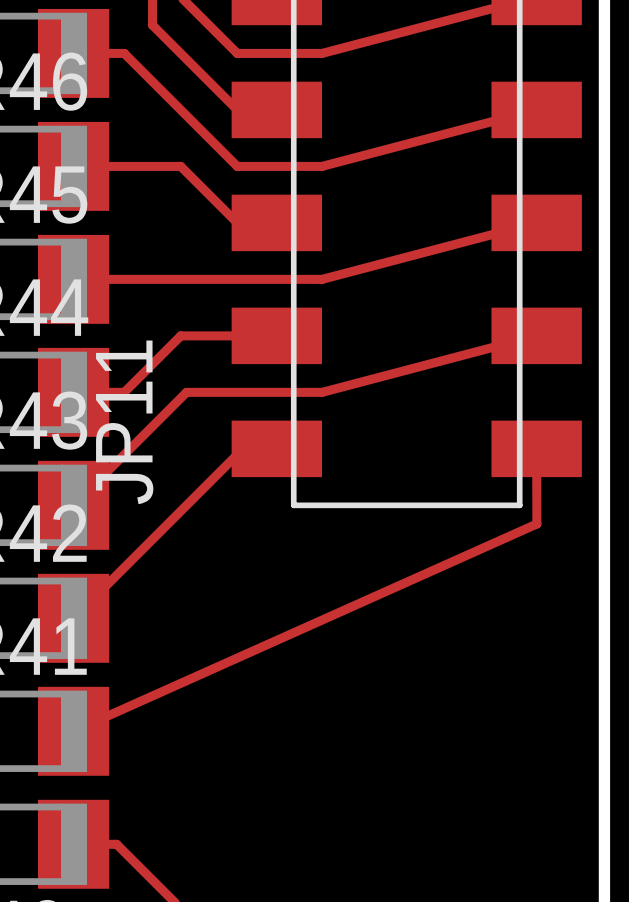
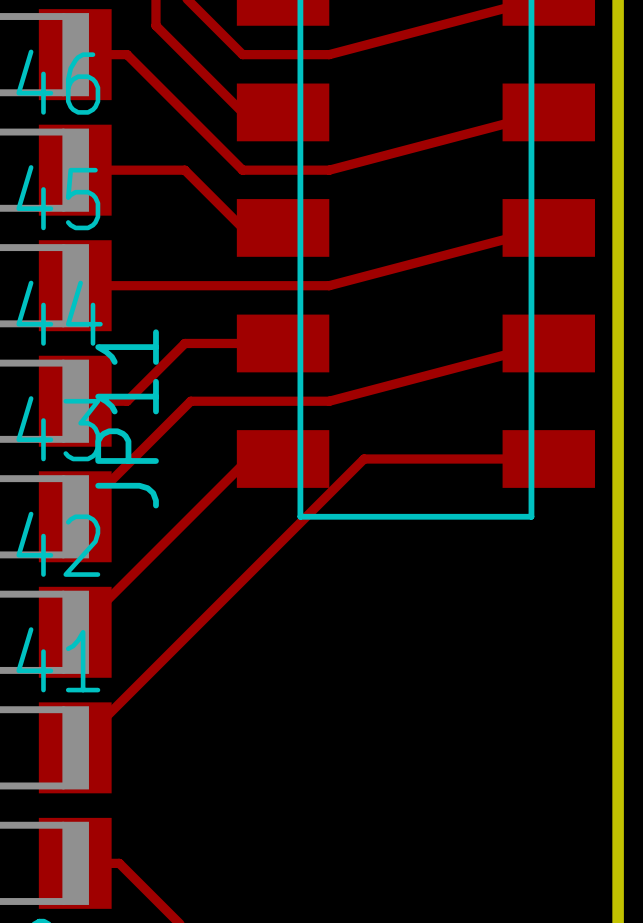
track: (536, 448) (536, 524) (73, 731) -> (548, 459) (364, 459) (75, 747)

